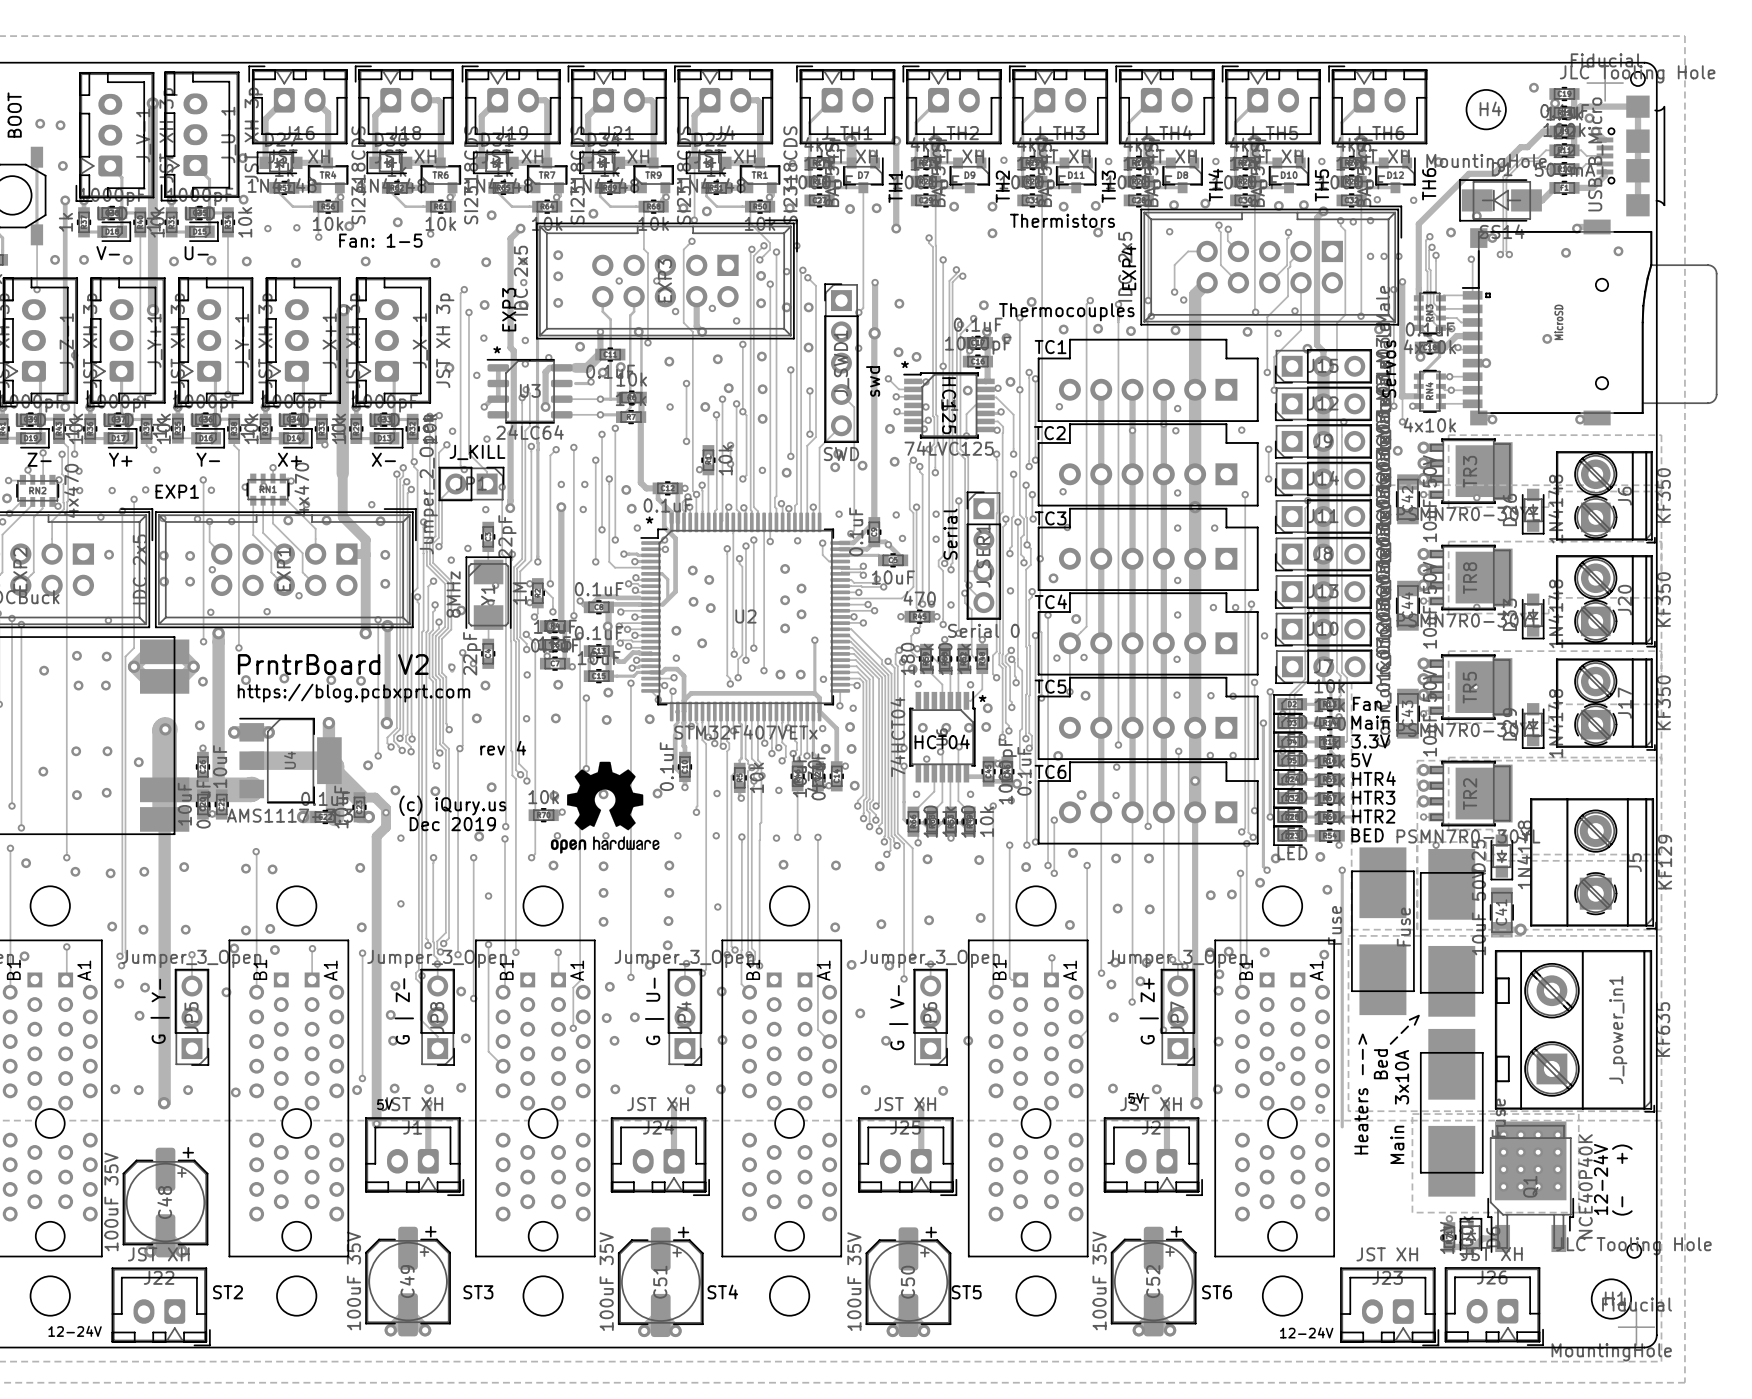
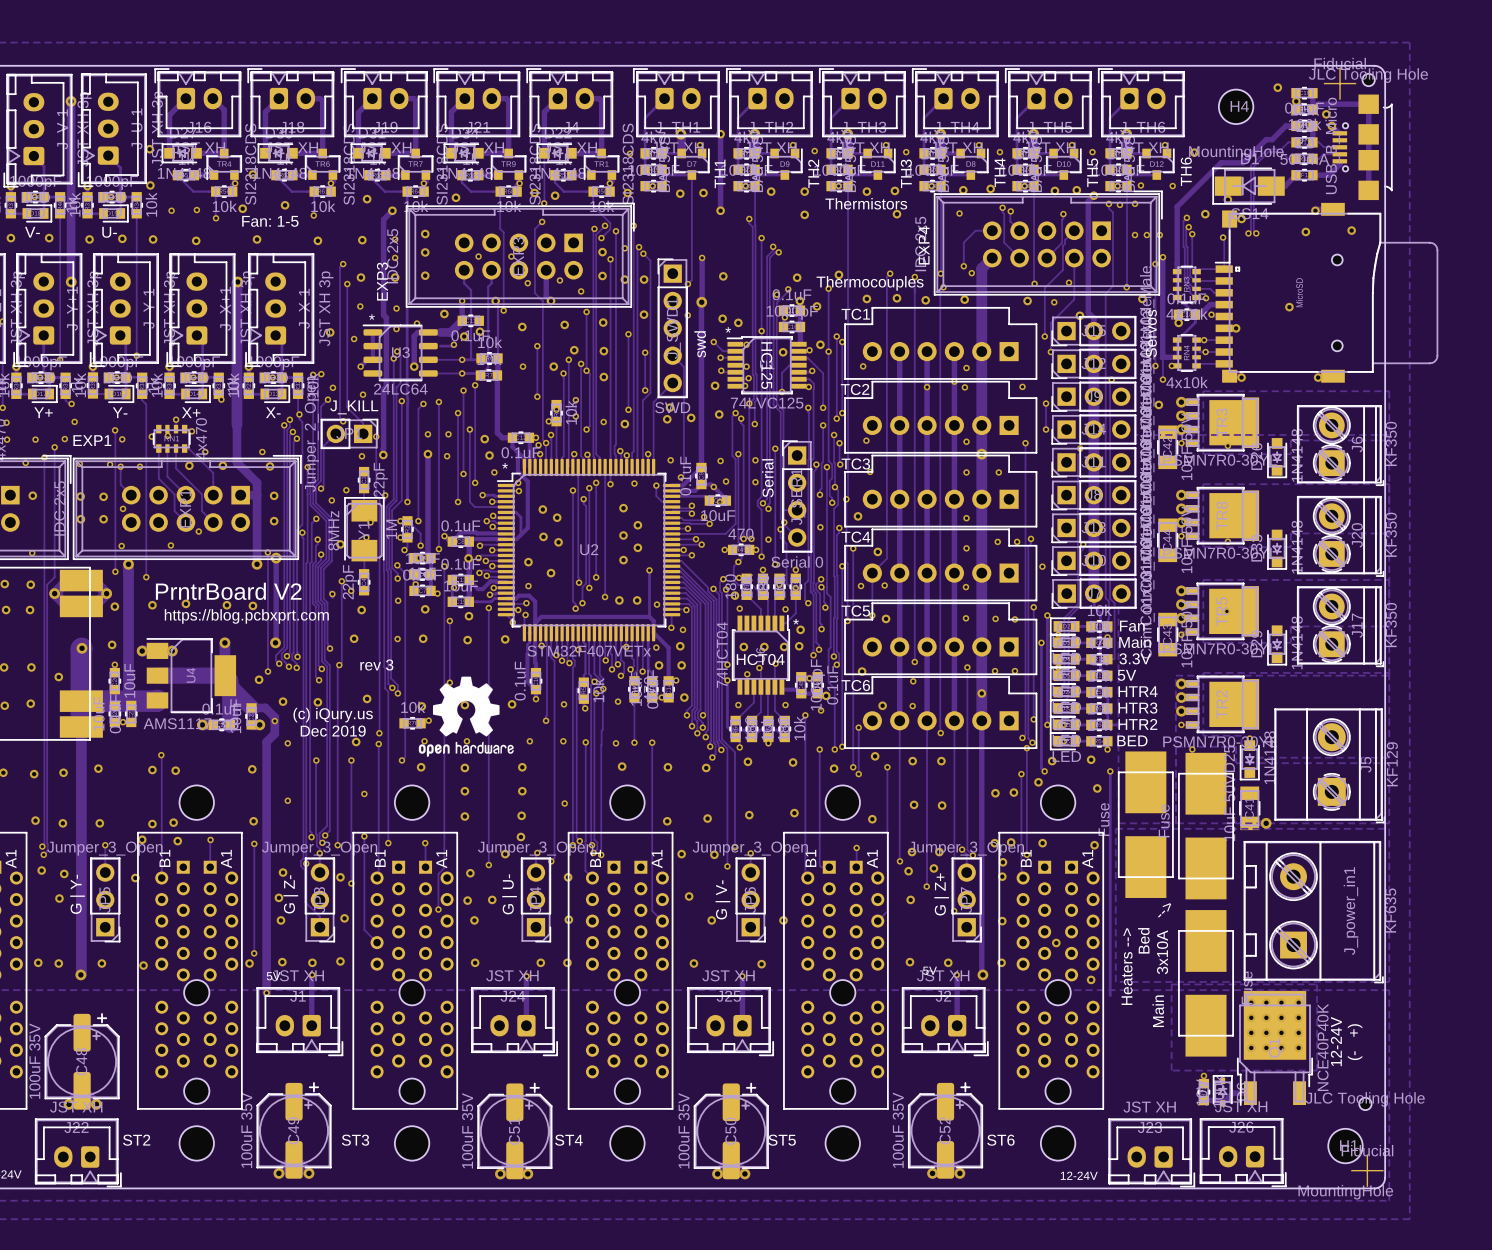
text: rev 4 (503, 748) -> rev 3 (376, 665)

